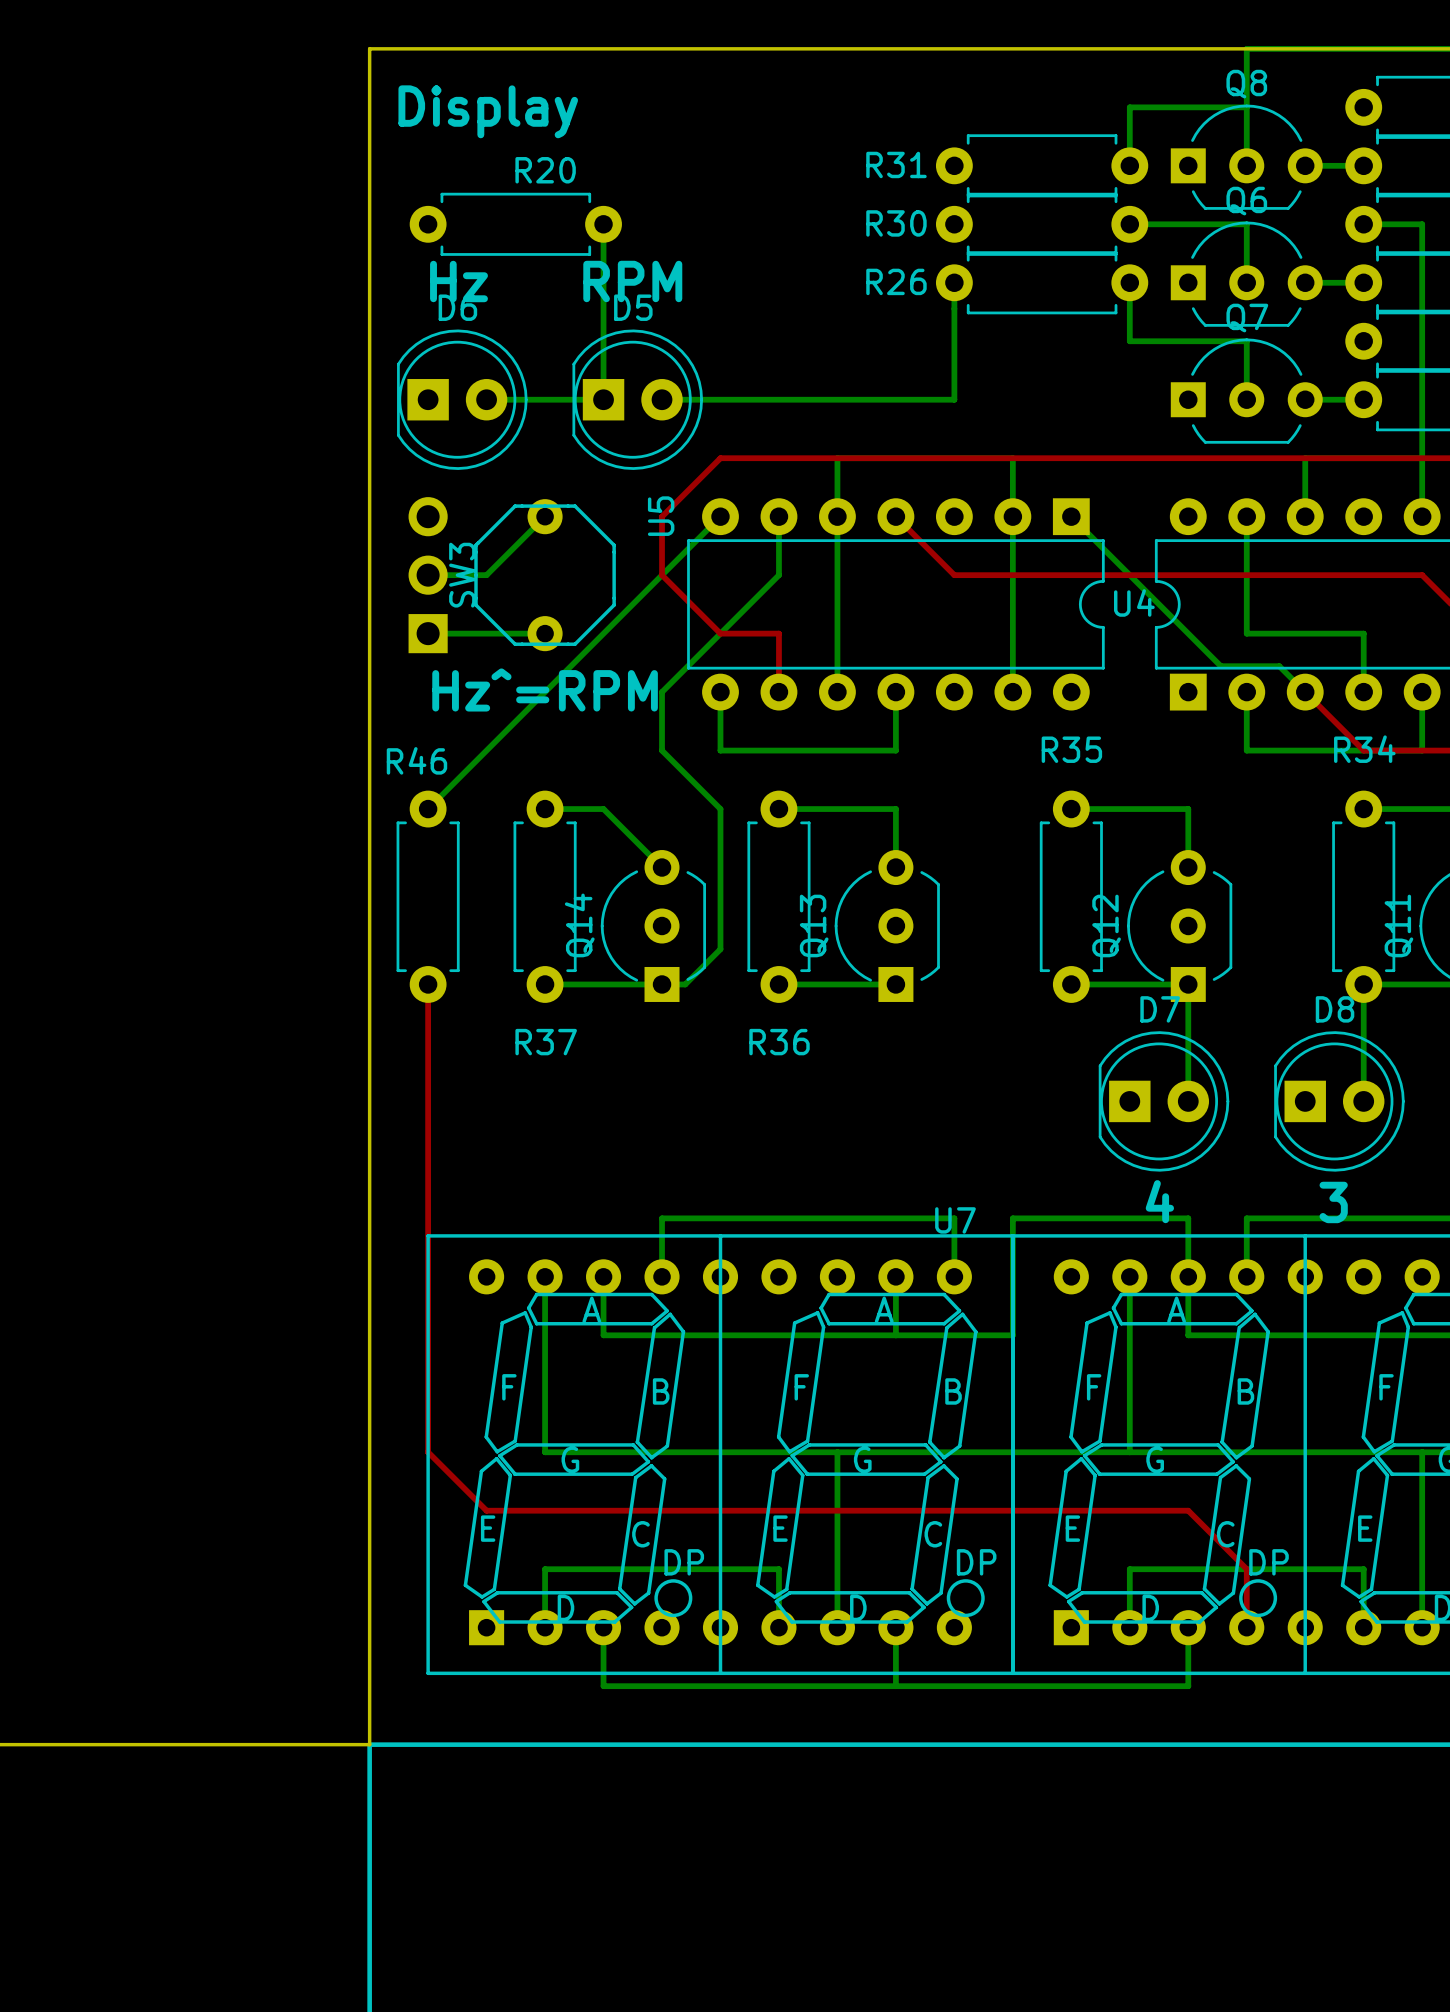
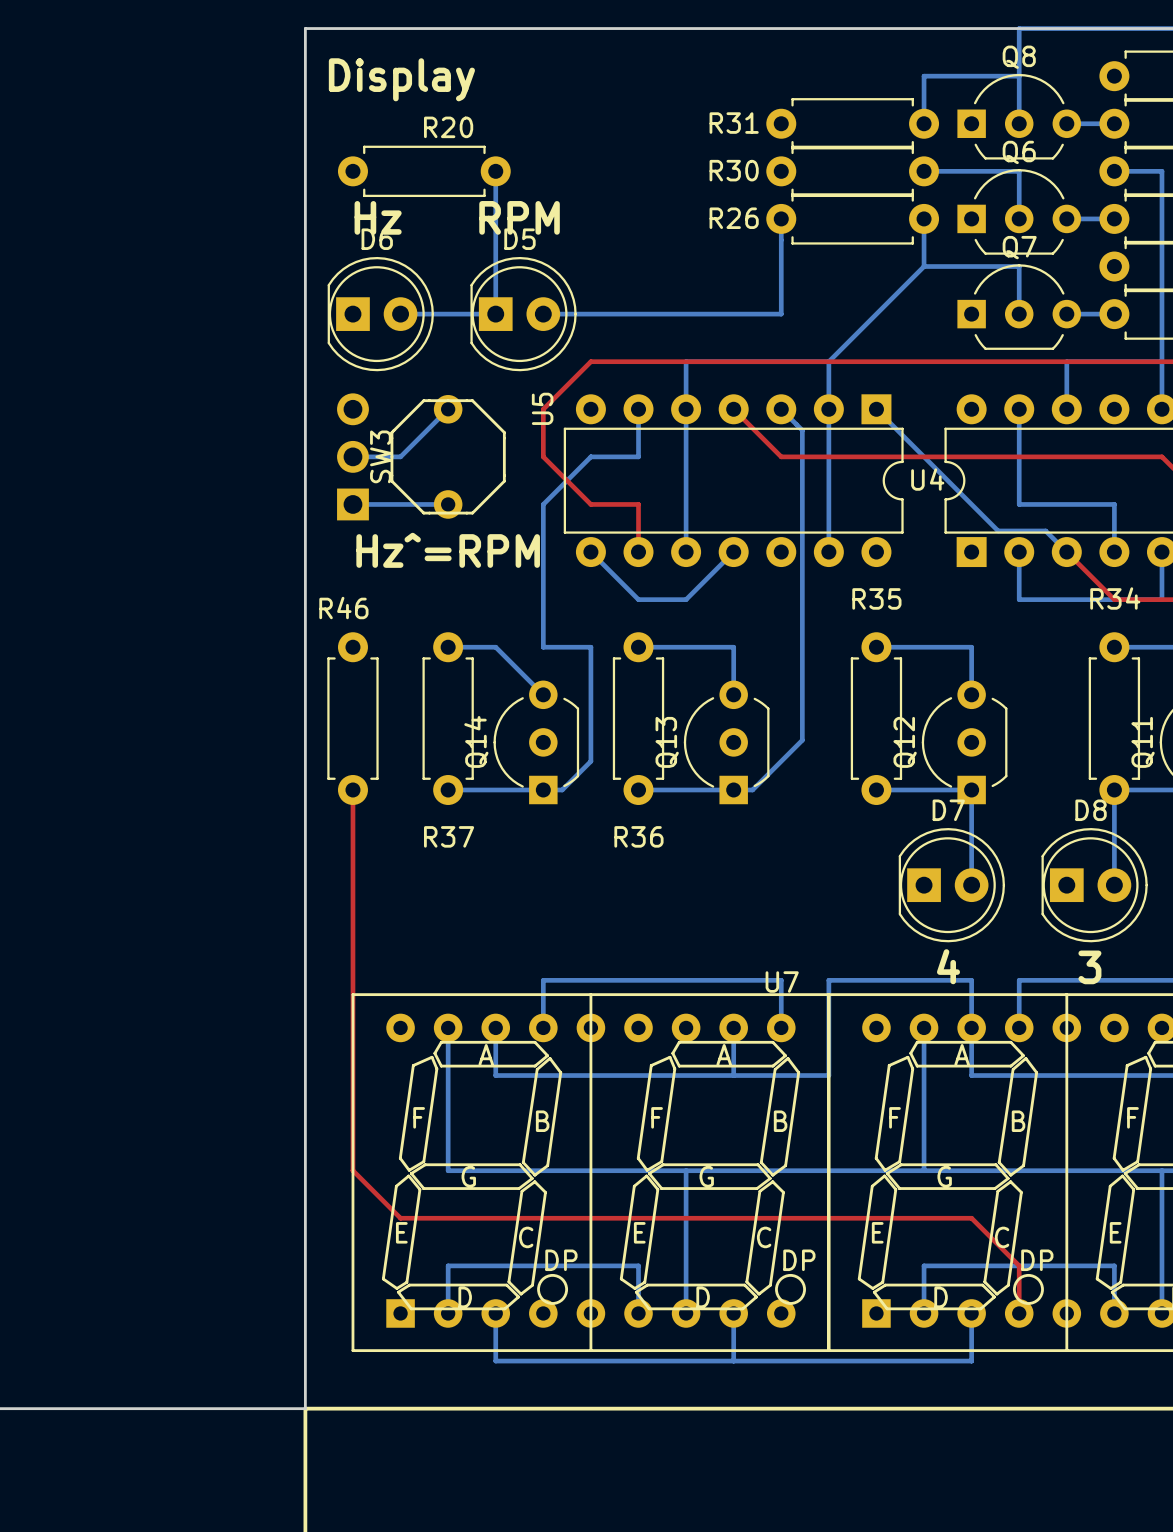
bottom track: none -> (924, 266) (828, 361)
bottom track: (720, 516) (428, 809) -> none
bottom track: none -> (781, 409) (802, 430) (802, 740) (752, 789) (733, 789)
bottom track: (778, 575) (662, 692) -> (638, 456) (590, 456) (543, 504) (543, 552)
bottom track: (720, 692) (720, 750) (778, 750) -> (590, 552) (638, 599)
bottom track: (895, 692) (895, 750) (837, 750) -> (733, 552) (686, 599)
bottom track: (662, 750) (720, 809) -> (543, 599) (543, 647) (590, 647)

